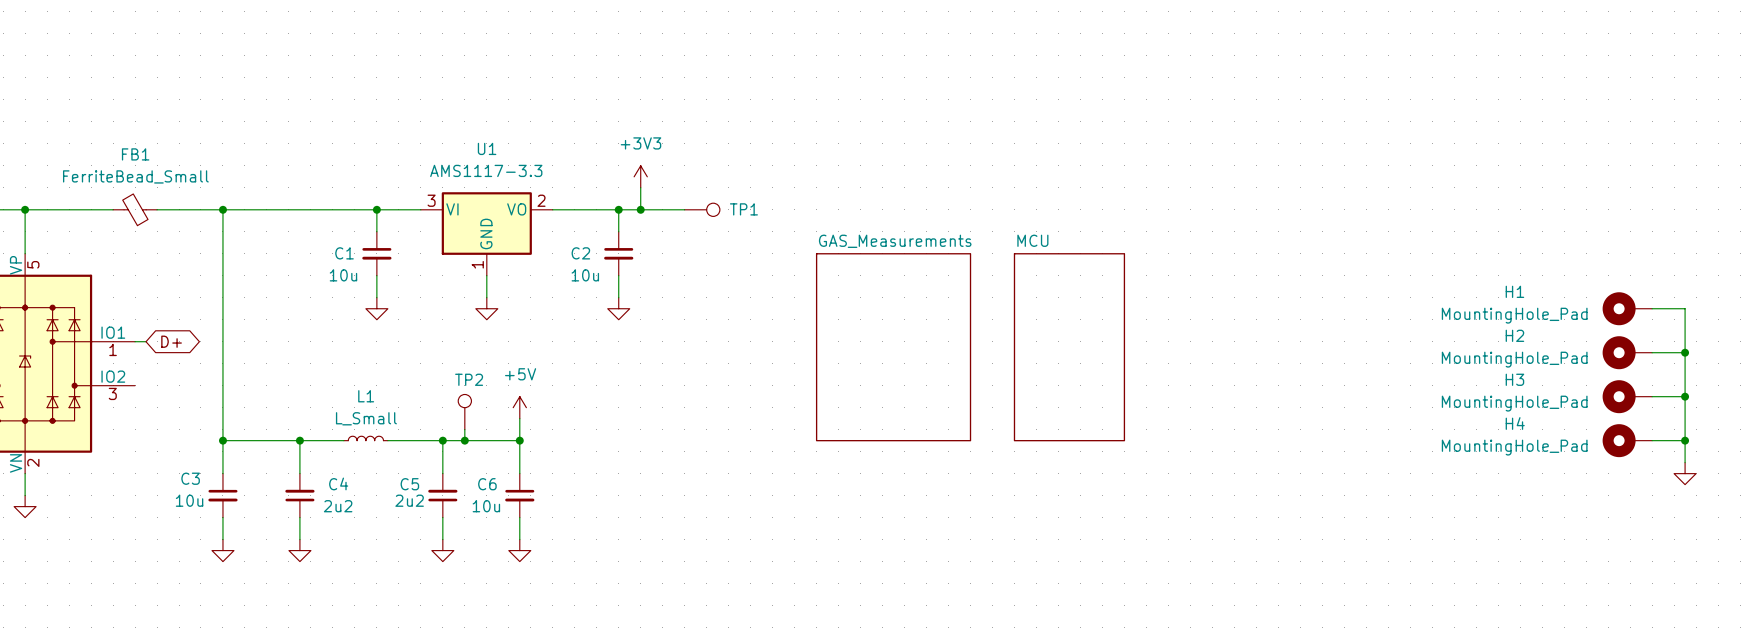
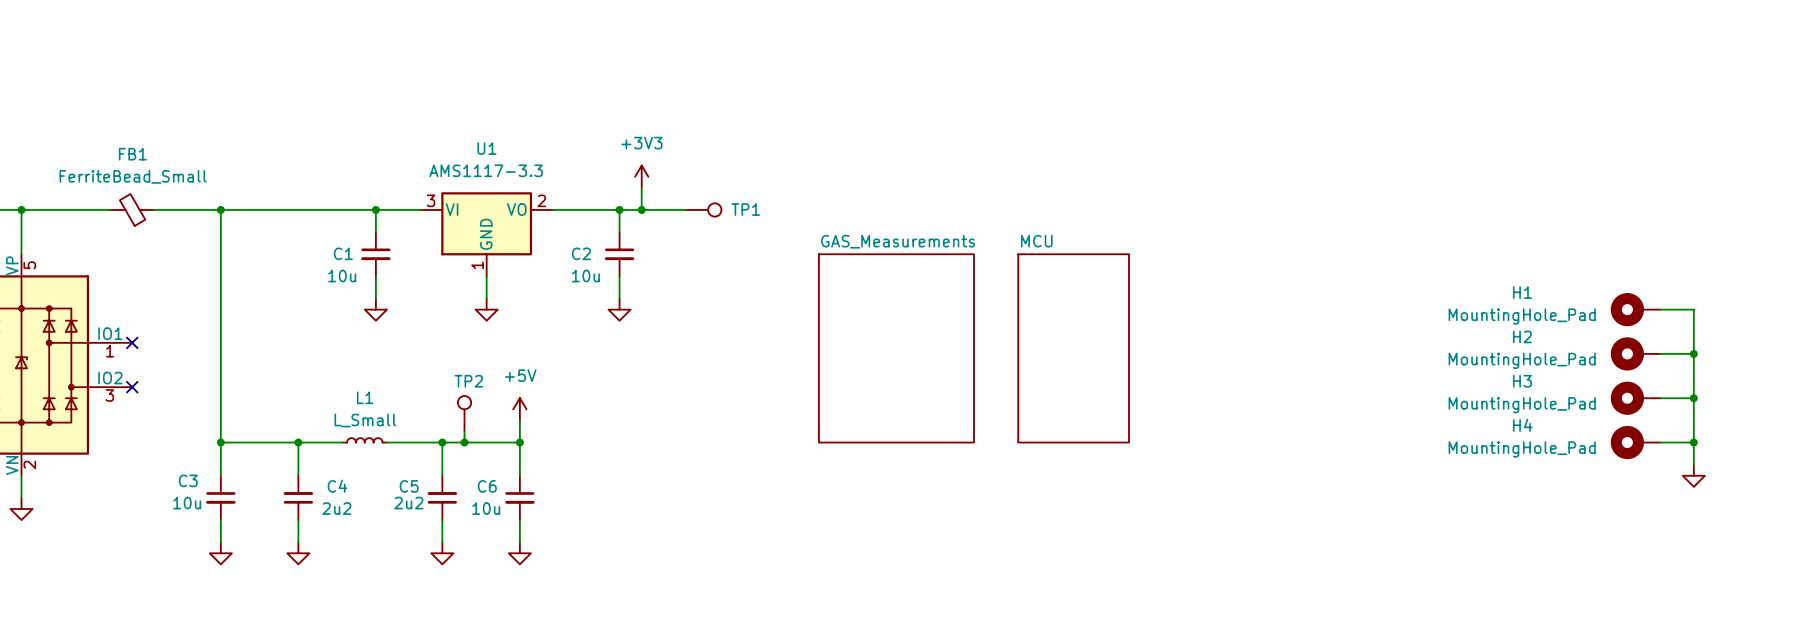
wire: (135, 341) (146, 341) -> none
no-connect mark: none -> (132, 342)
global label: D+ (171, 341) -> none
no-connect mark: none -> (132, 387)

